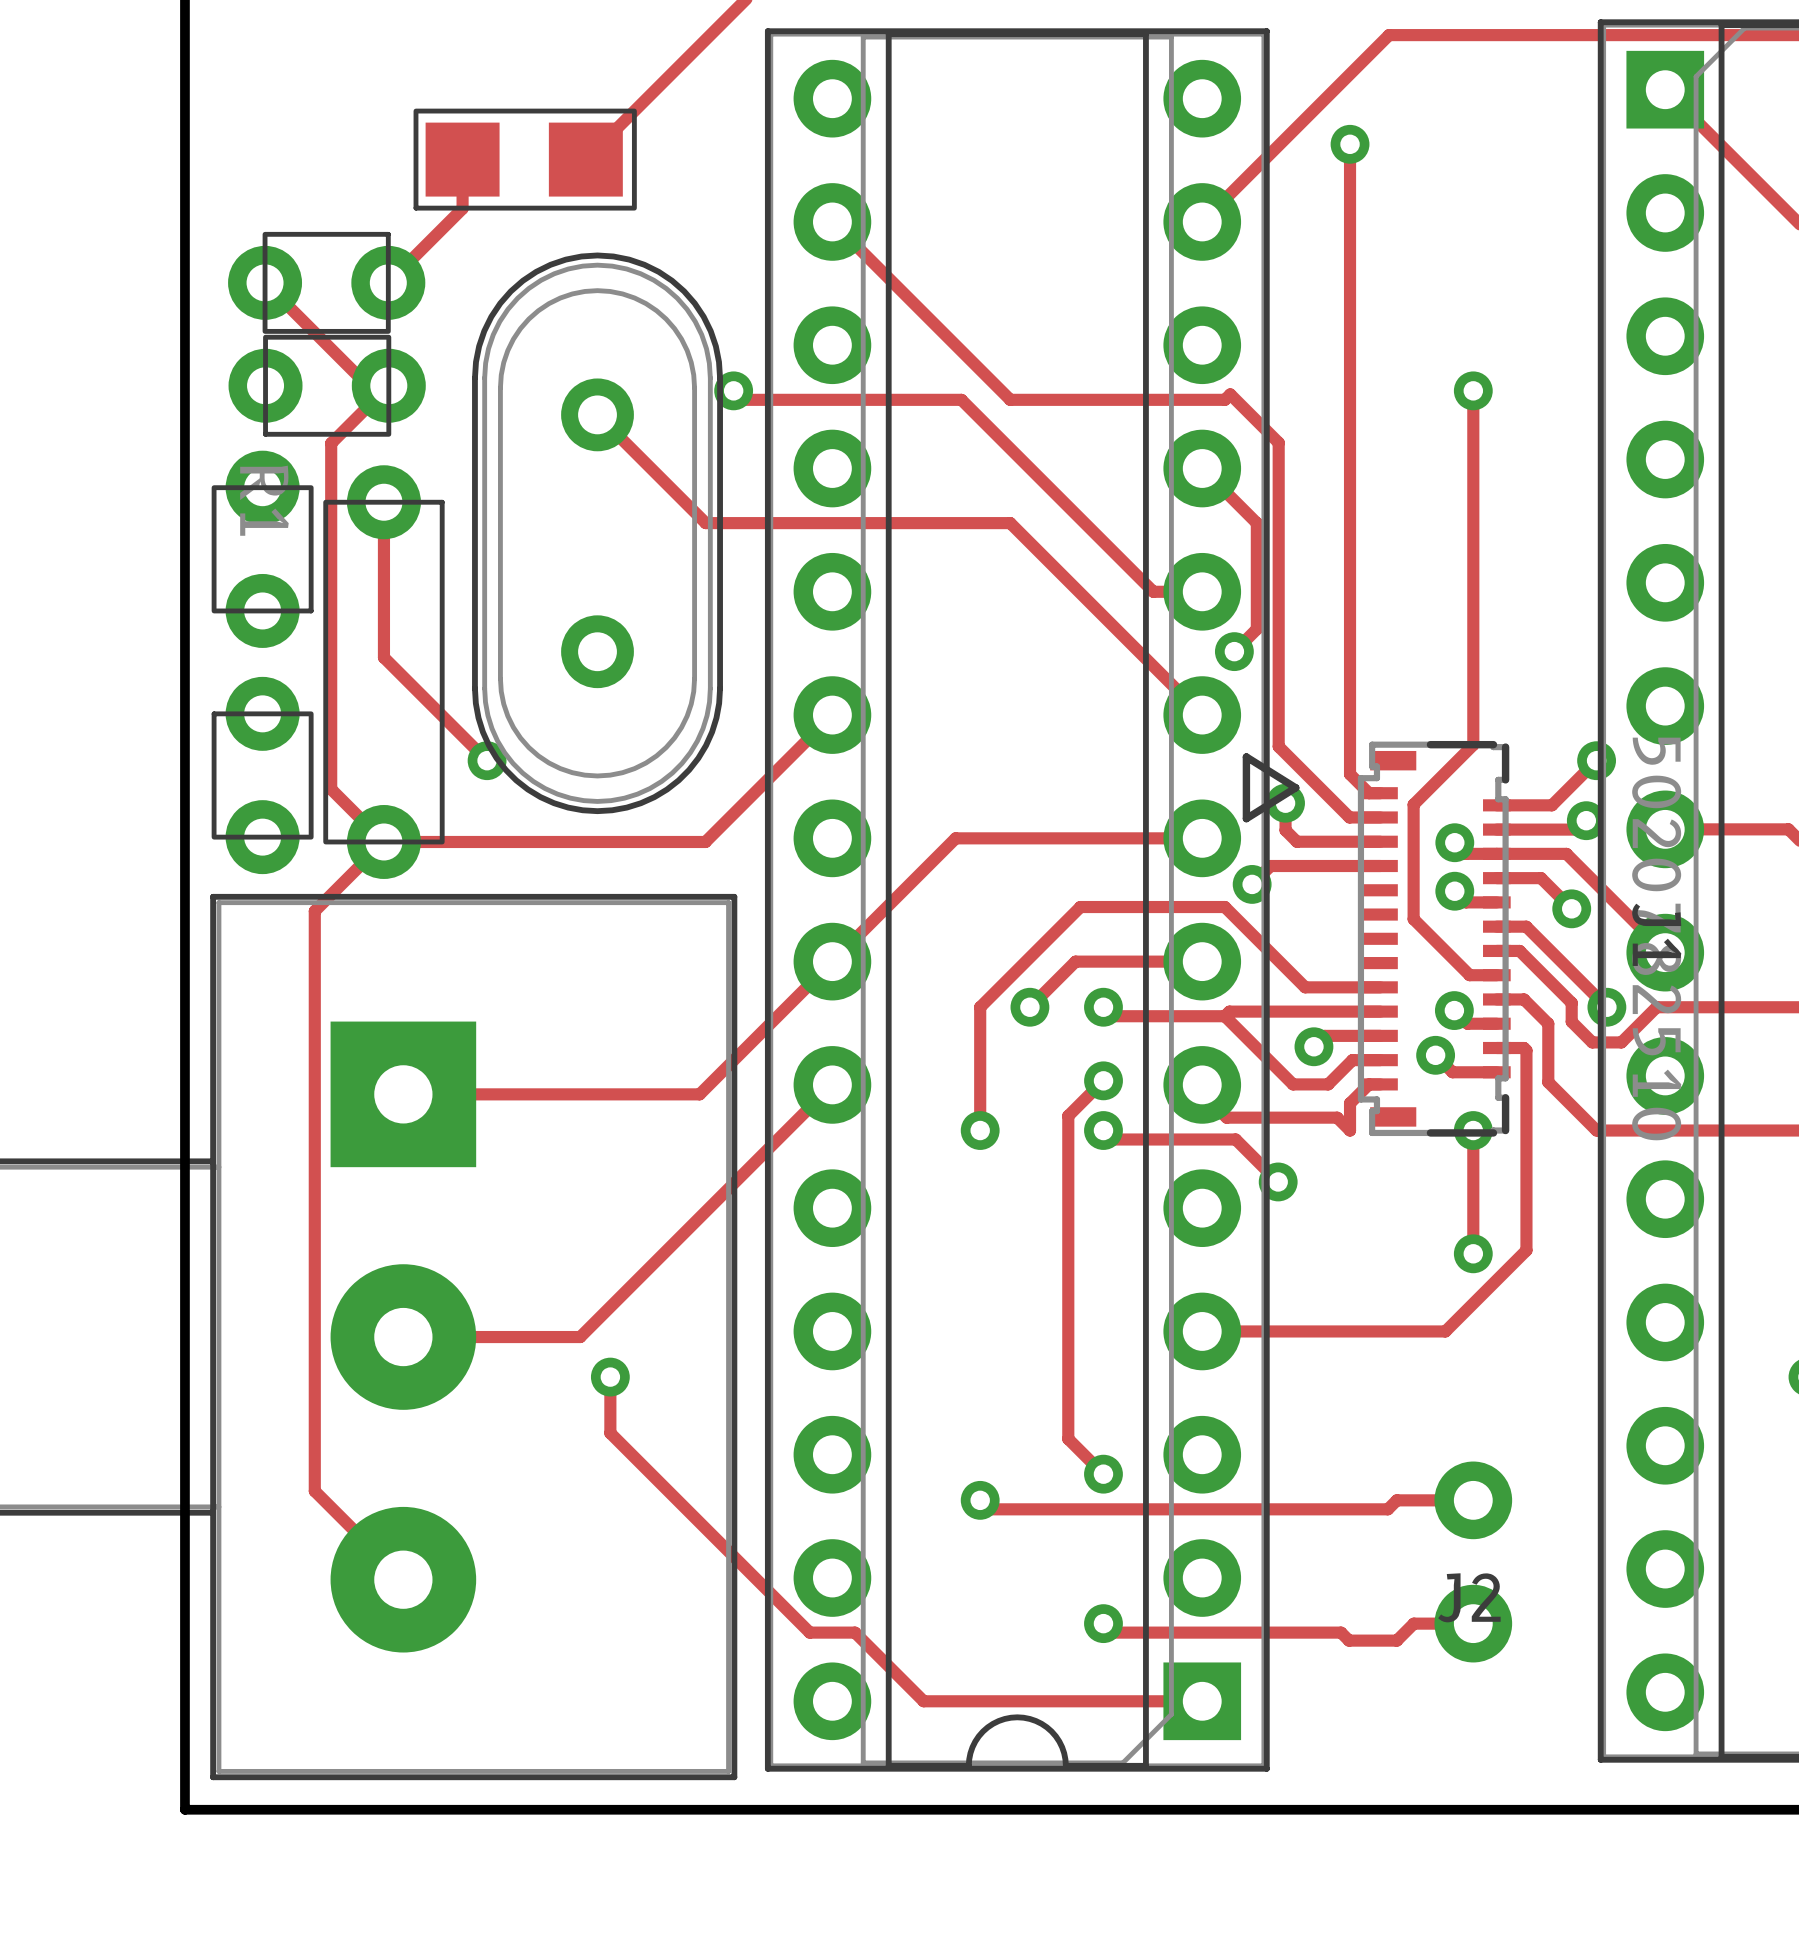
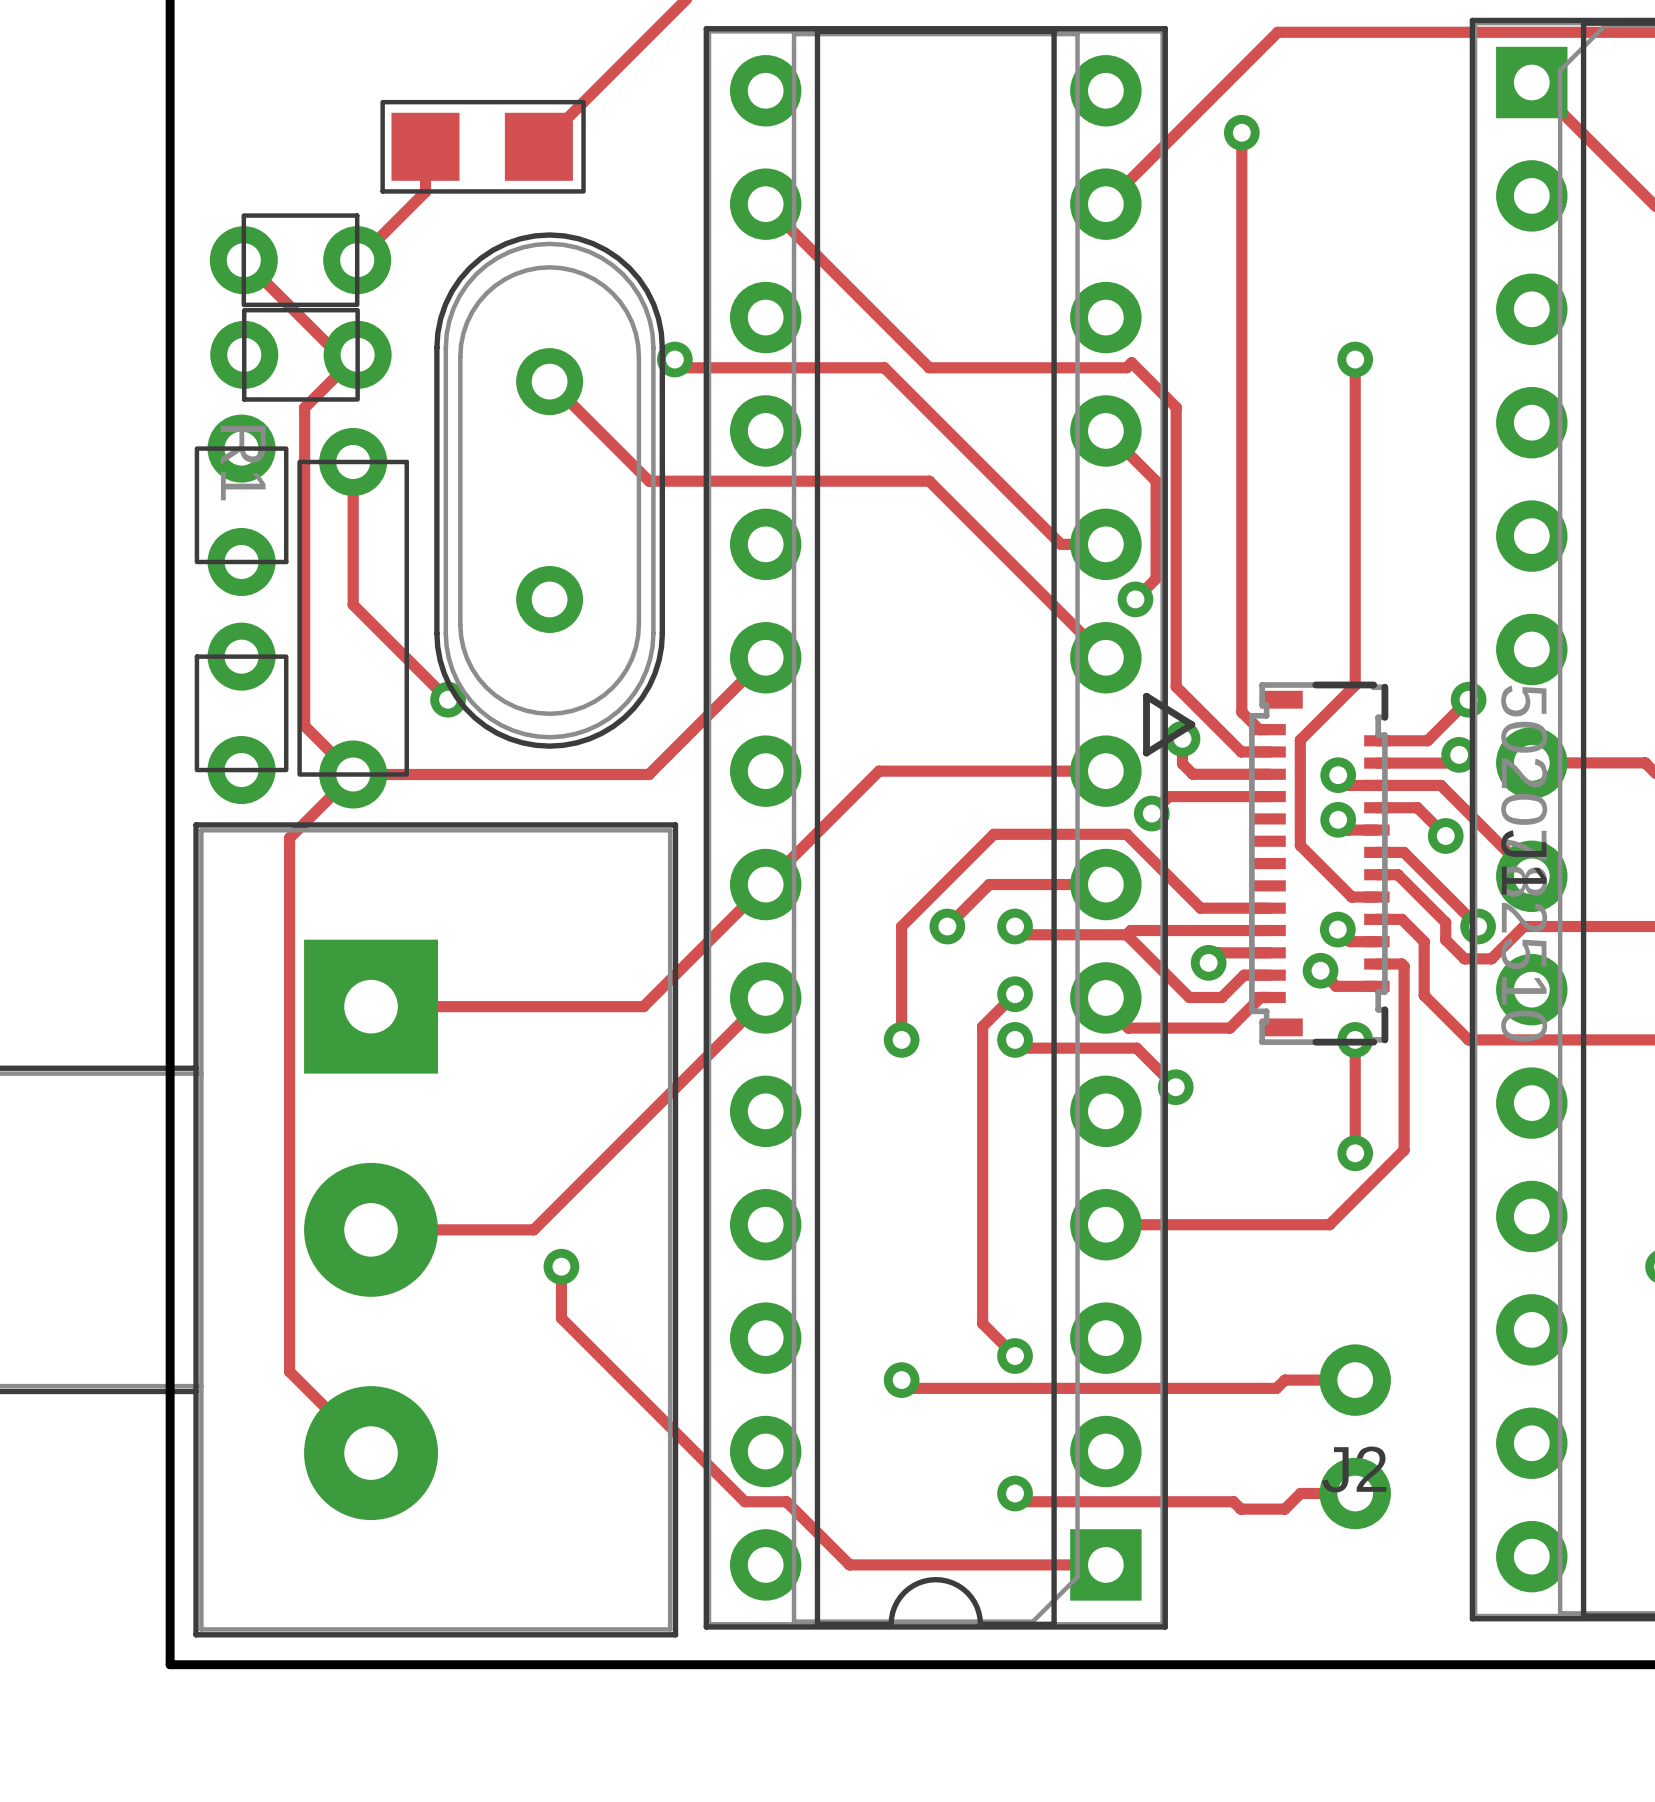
track: (1368, 1084) (1350, 1103) (1350, 1130) (1337, 1117) -> (1260, 997) (1229, 1028)

